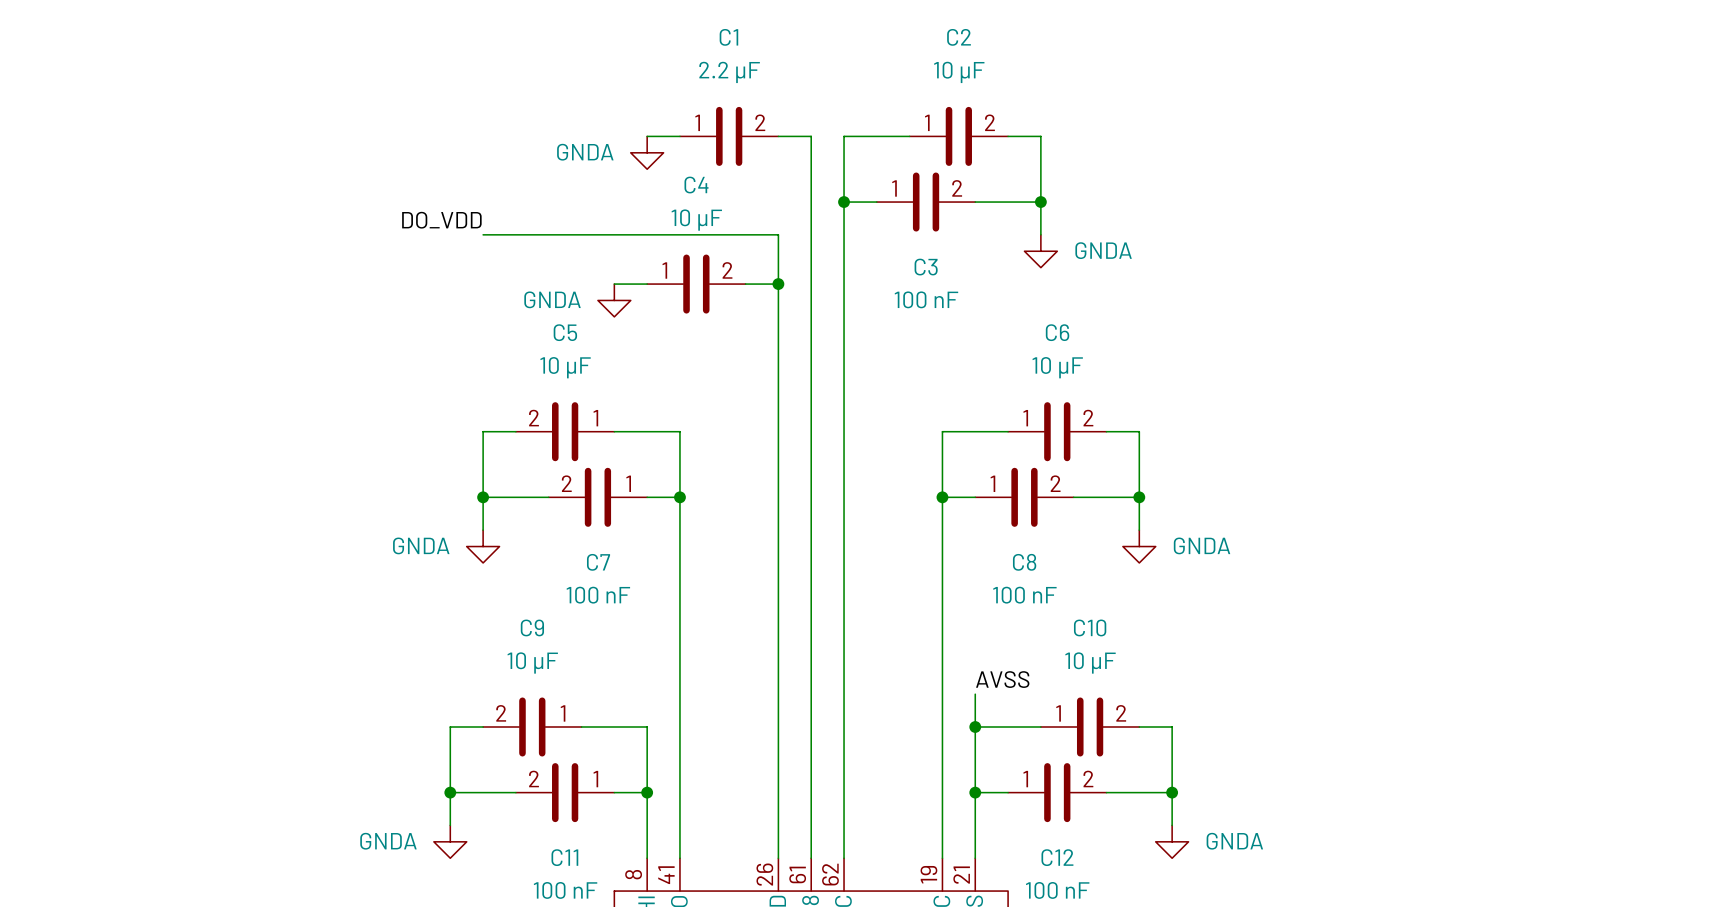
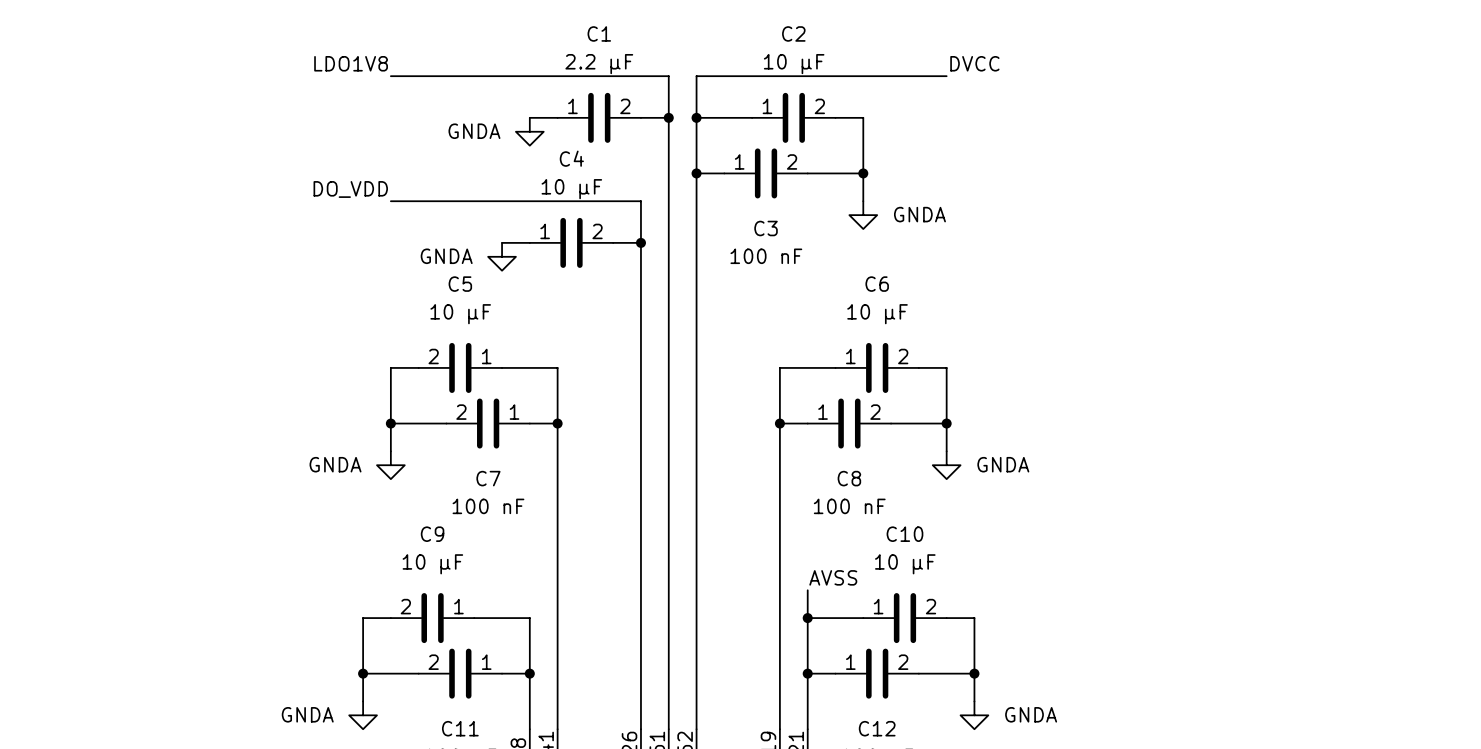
label: none -> LDO1V8 (351, 63)
label: none -> DVCC (974, 63)
wire: none -> (390, 76) (668, 76) (668, 117)
wire: none -> (946, 76) (696, 76) (696, 117)
junction: none -> (668, 117)
junction: none -> (696, 117)

